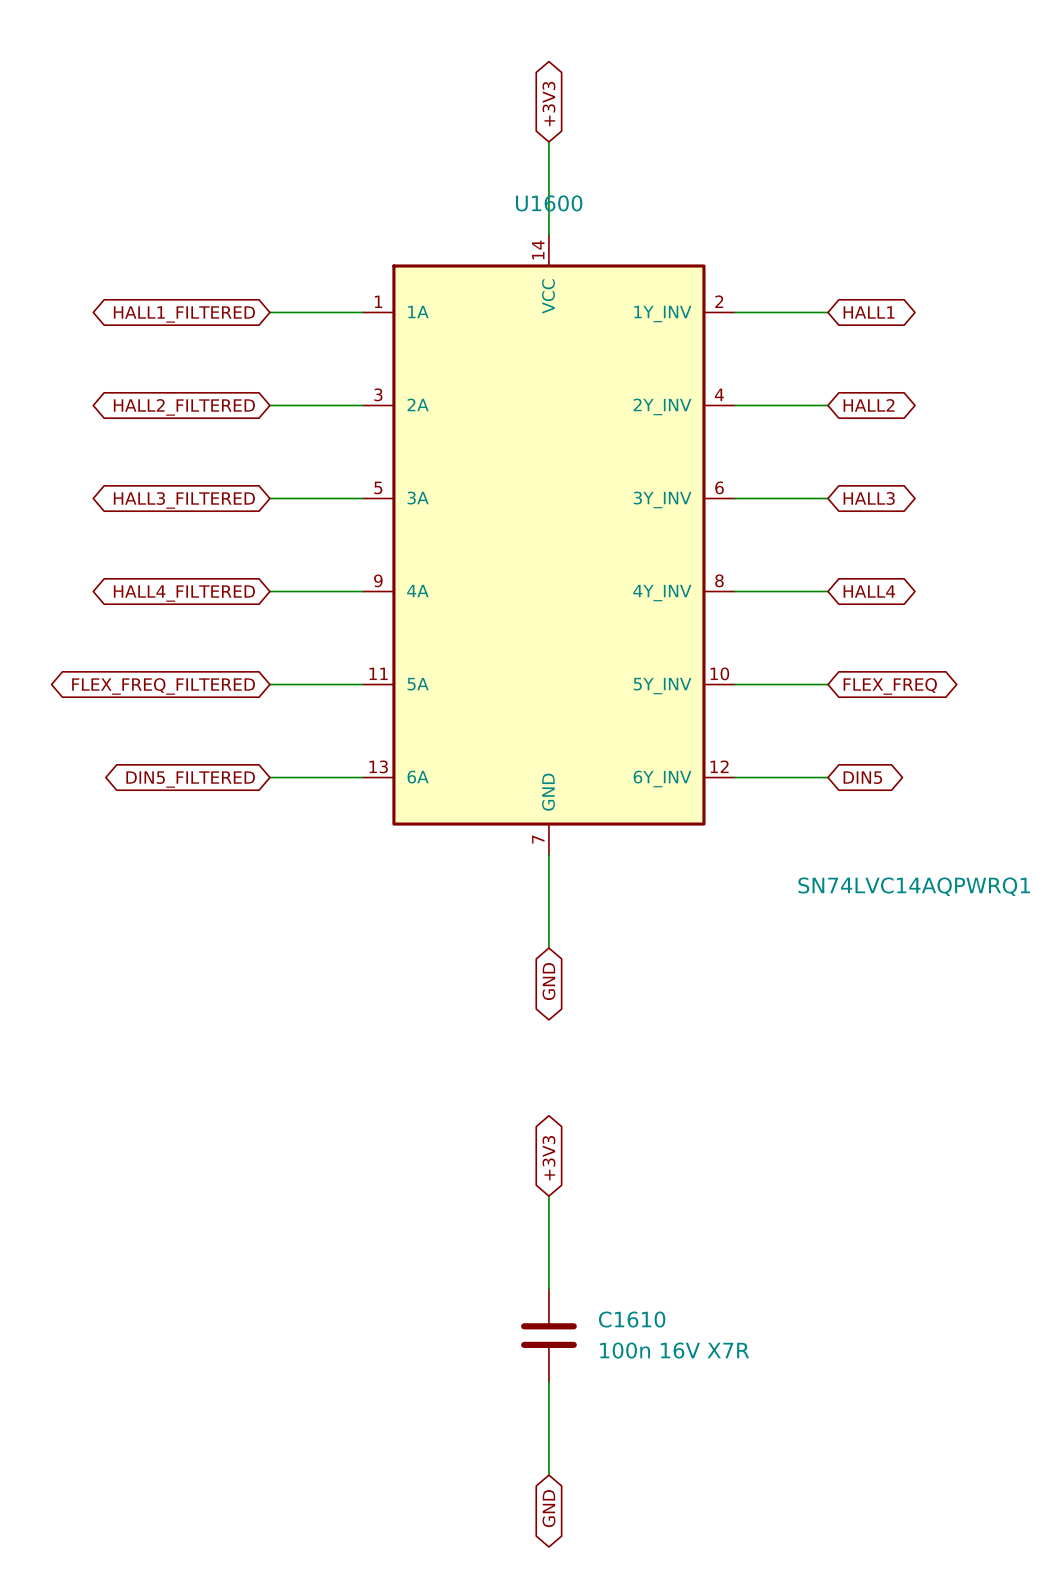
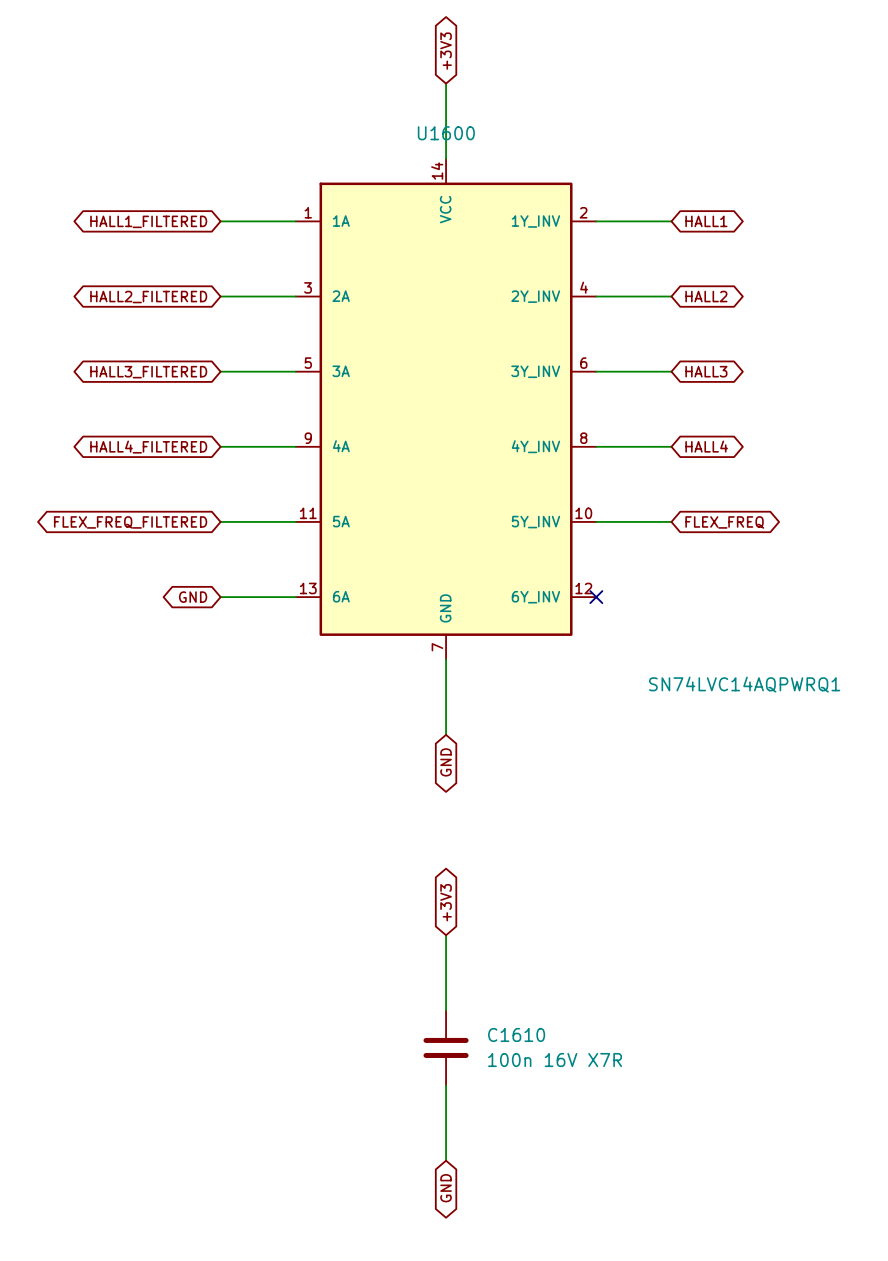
wire: (734, 777) (827, 777) -> none
no-connect mark: none -> (596, 597)
global label: DIN5 (862, 777) -> none
global label: DIN5_FILTERED (190, 779) -> GND (193, 597)

